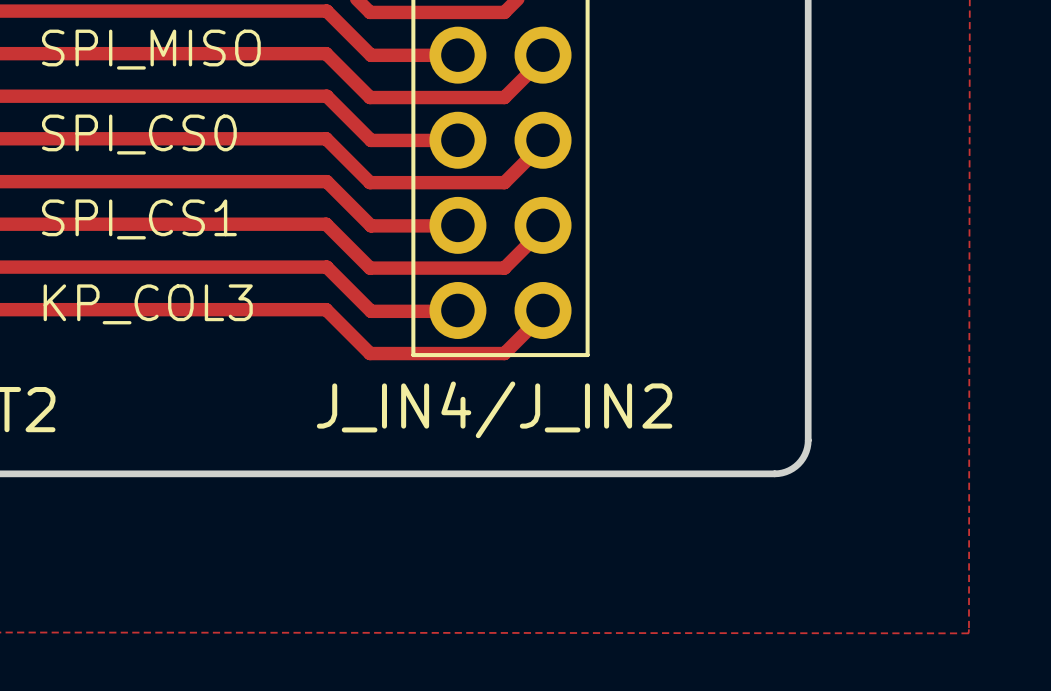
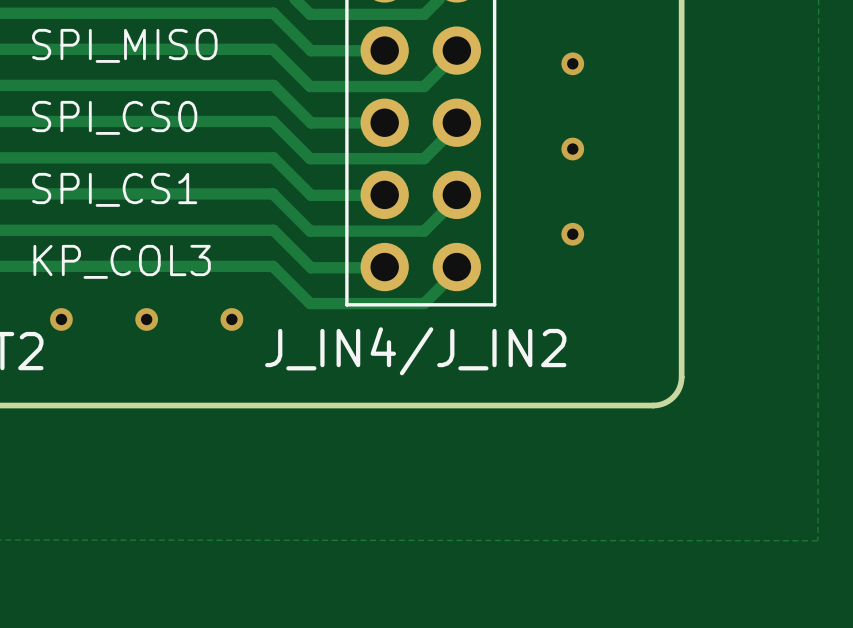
via: none -> (572, 63)
via: none -> (572, 149)
via: none -> (572, 234)
via: none -> (61, 319)
via: none -> (146, 319)
via: none -> (231, 319)

